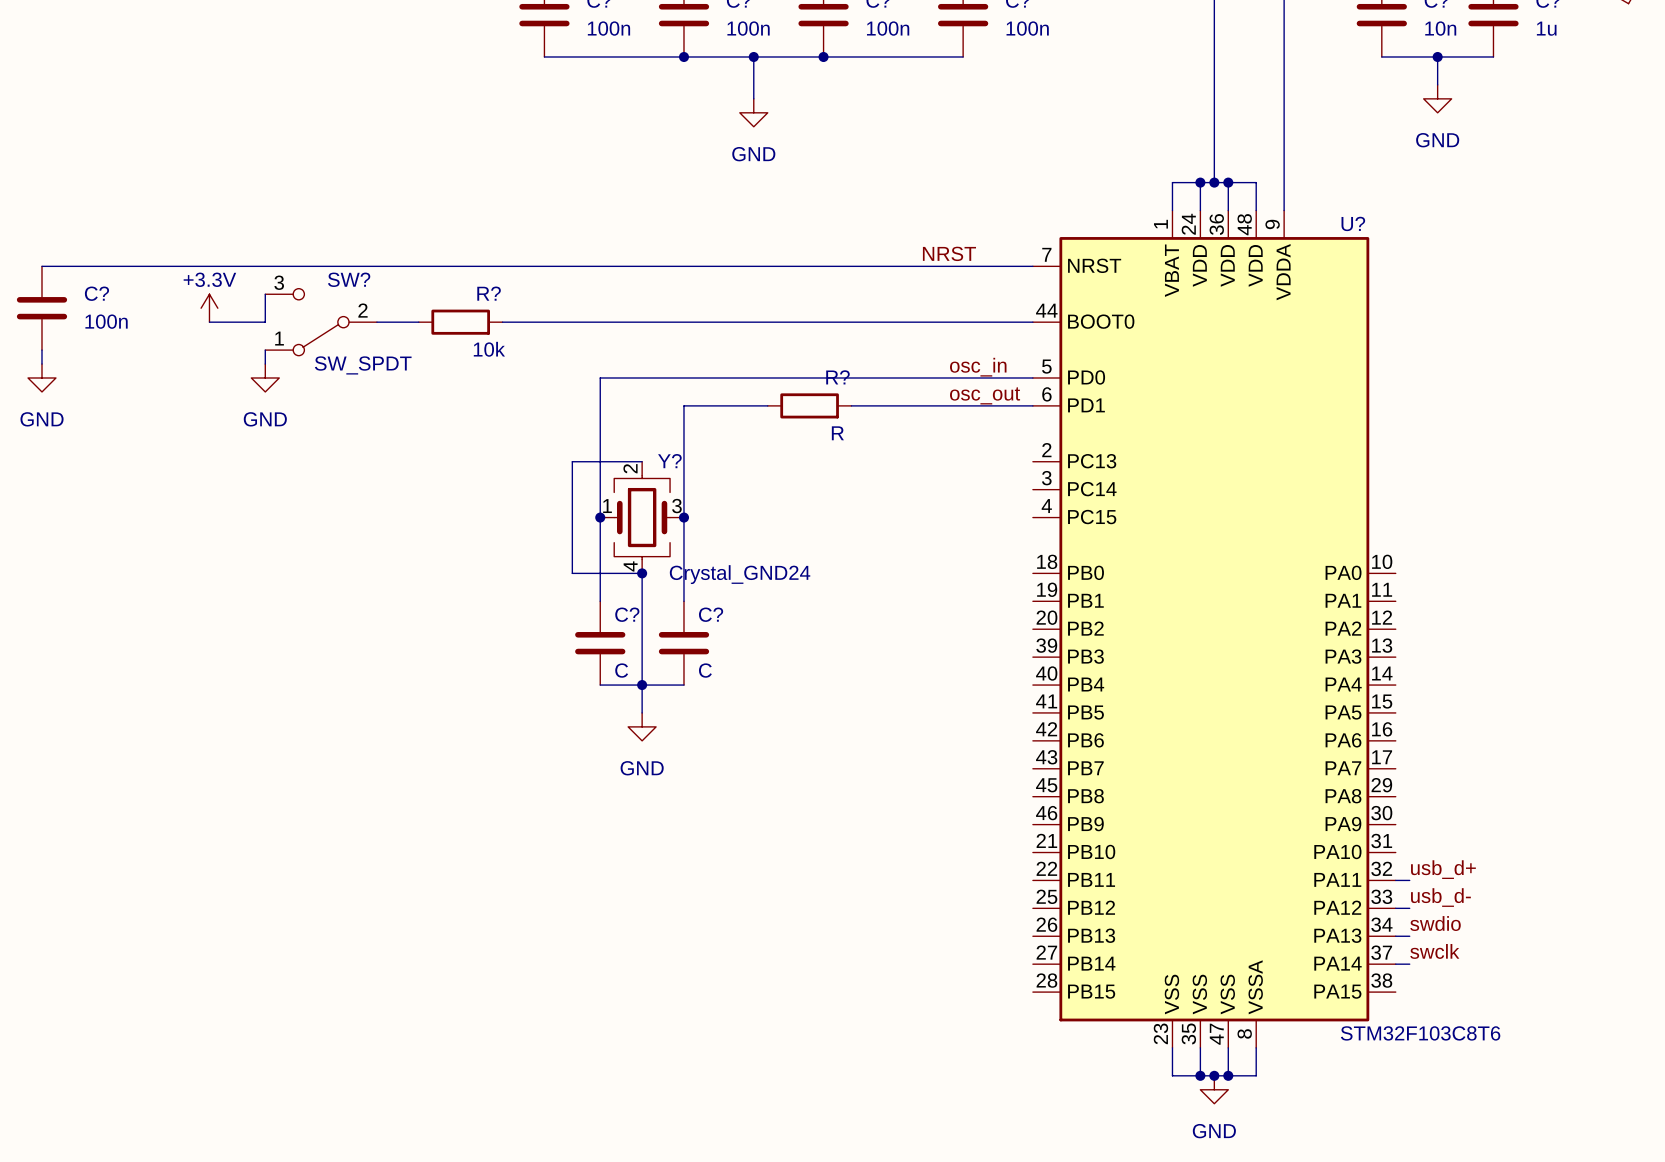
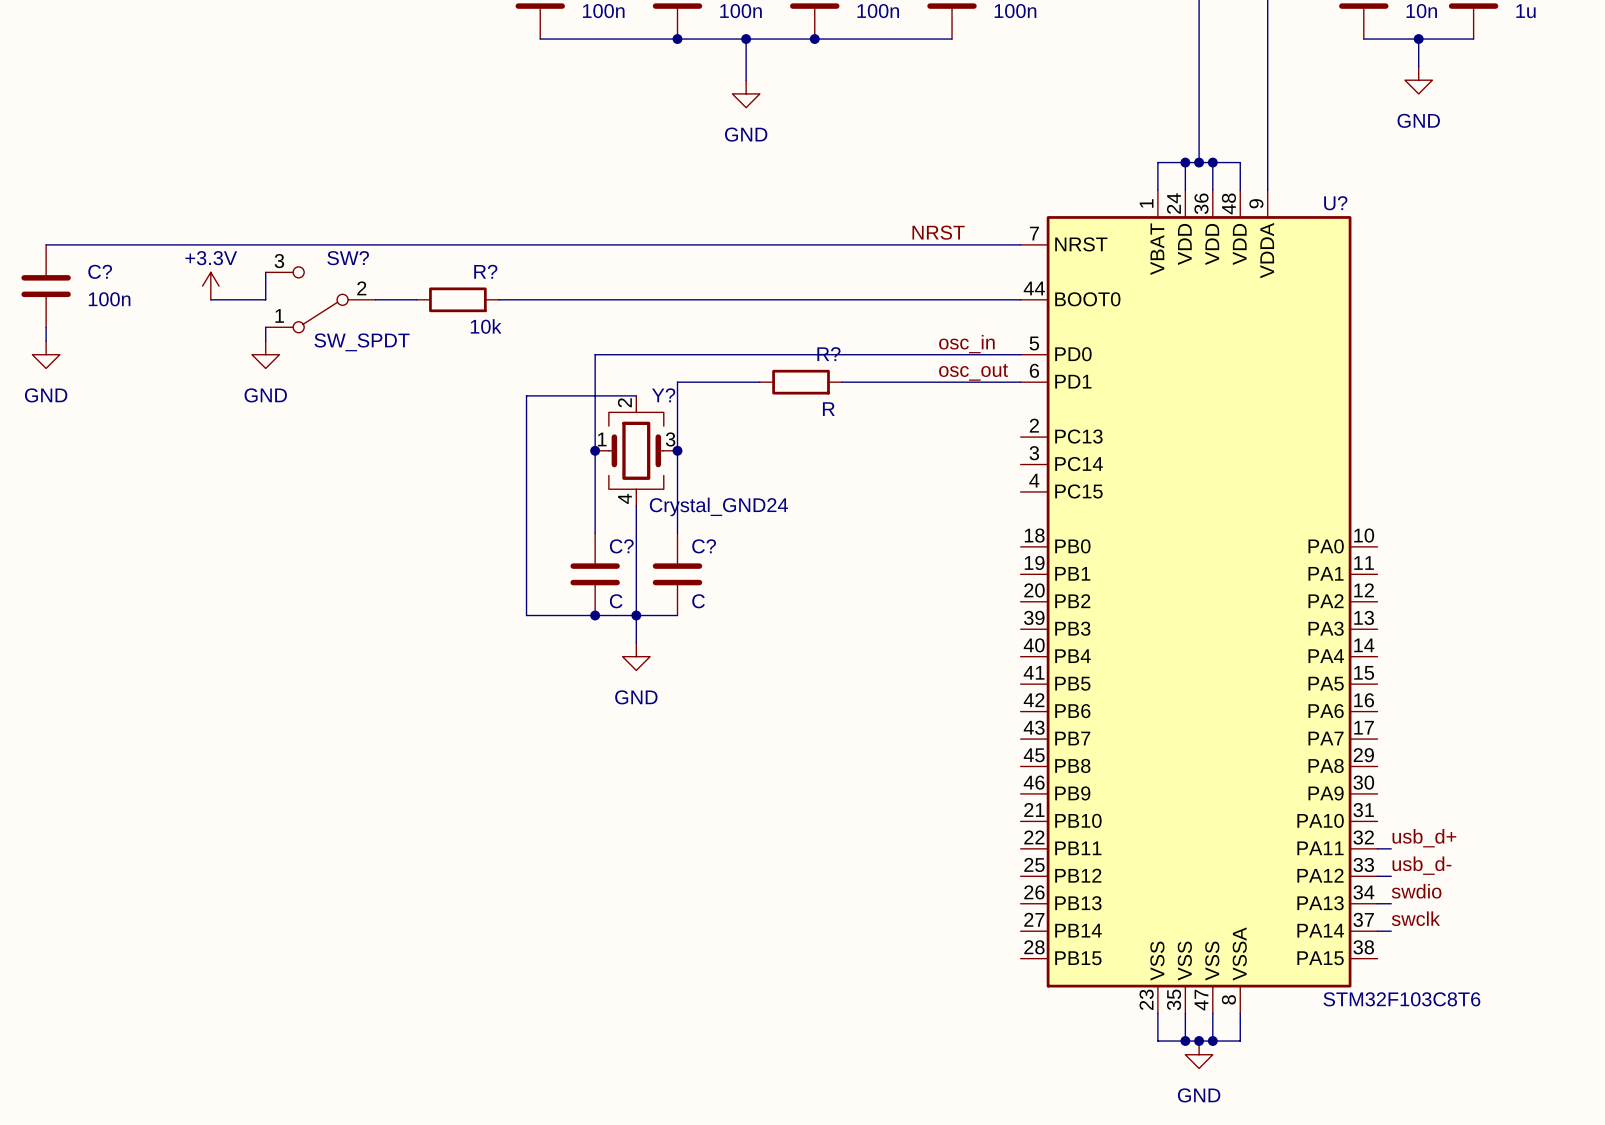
wire: none -> (636, 395) (526, 395) (526, 615) (677, 615)
wire: (642, 461) (572, 461) (572, 573) (642, 573) -> (636, 505) (636, 546)
junction position: (600, 517) -> (595, 450)
Y? position: (642, 517) -> (636, 450)
junction position: (683, 517) -> (677, 450)
junction: (642, 573) -> none
Y? value position: Crystal_GND24 (740, 574) -> Crystal_GND24 (718, 506)
junction: none -> (595, 615)
C? position: (600, 643) -> (595, 574)
junction: none -> (636, 615)
C? position: (683, 643) -> (677, 574)
wire: (642, 671) (642, 712) -> none
wire: (600, 685) (683, 685) -> none
junction: (642, 685) -> none
power symbol position: GND (642, 726) -> GND (636, 656)

